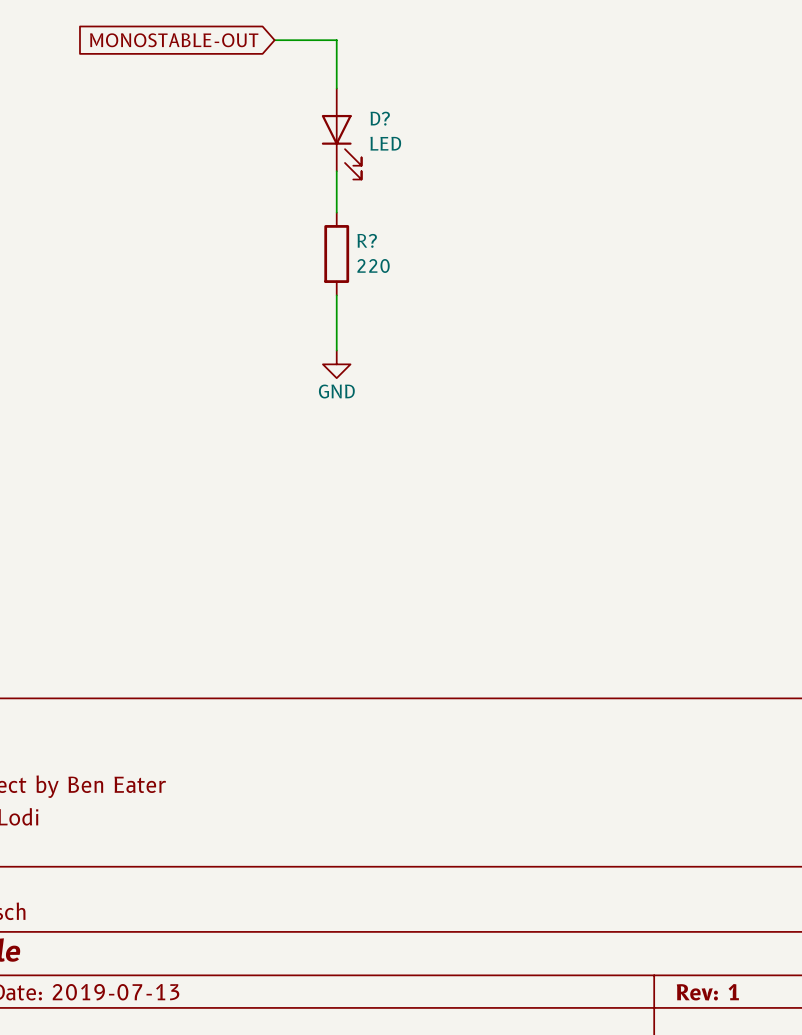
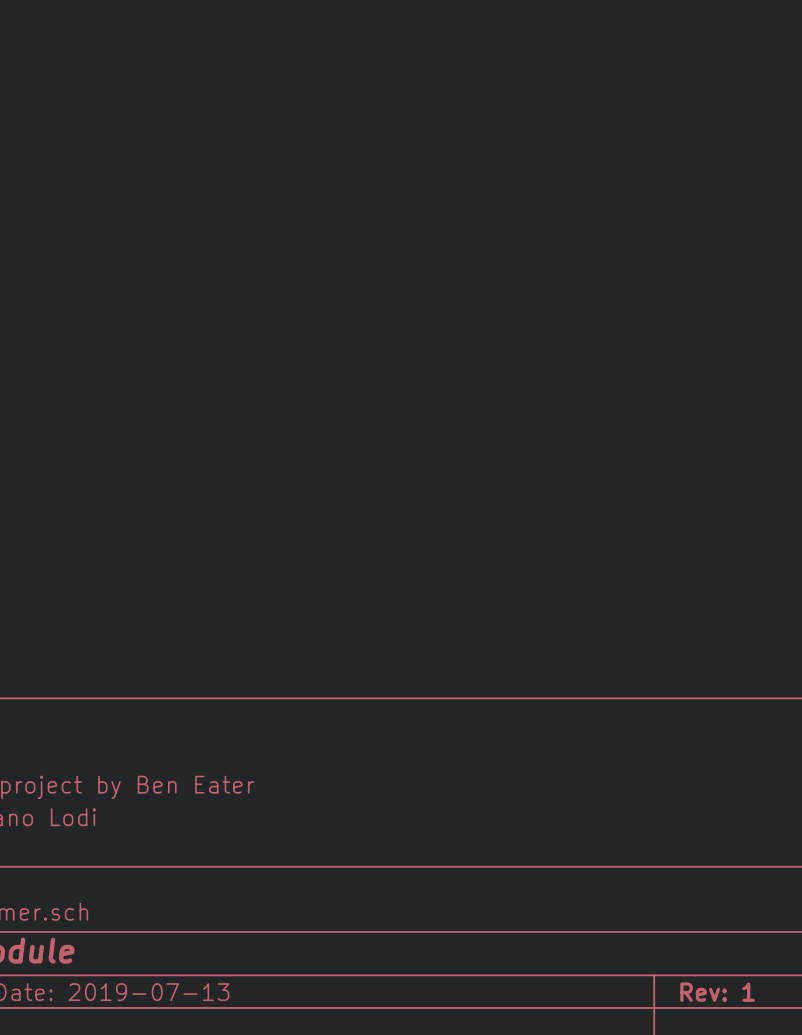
global label: MONOSTABLE-OUT (174, 40) -> none
wire: (274, 40) (336, 40) (336, 88) -> none
D?: LED (341, 133) -> none
wire: (336, 171) (336, 212) -> none
R?: 220 (336, 254) -> none
wire: (336, 295) (336, 350) -> none
power symbol: GND (336, 364) -> none

